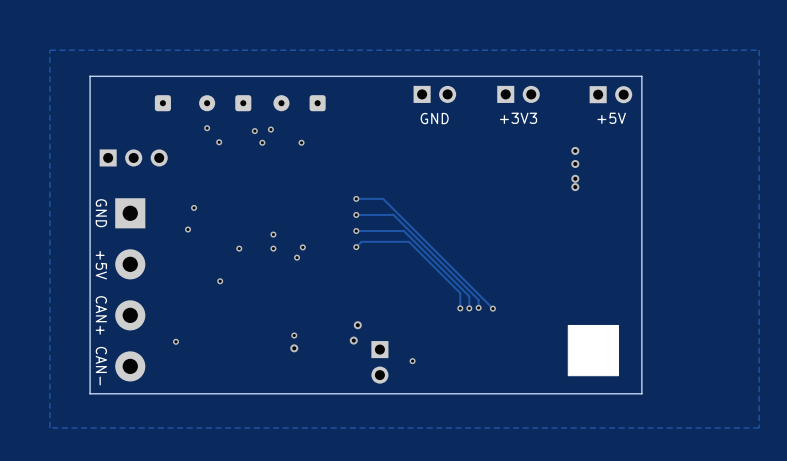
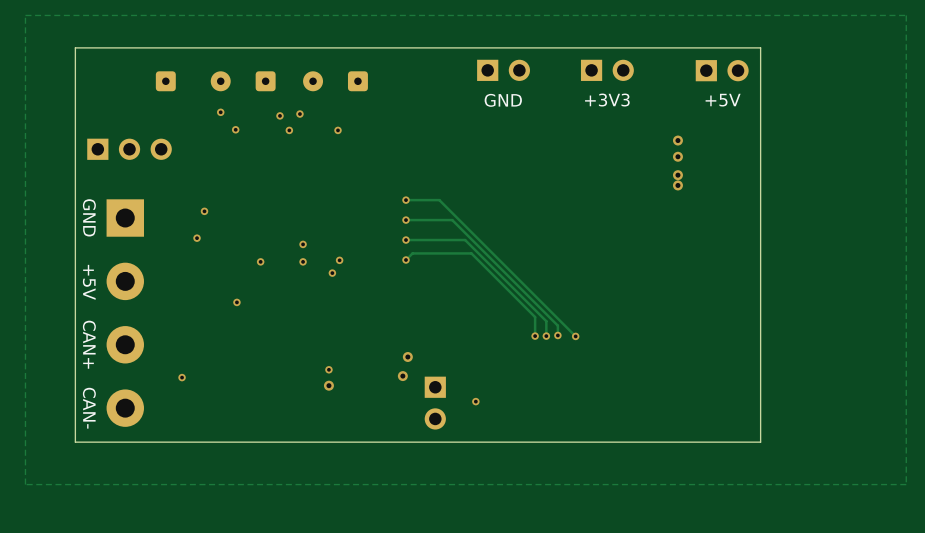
drawing: [567, 324, 620, 377] -> none

